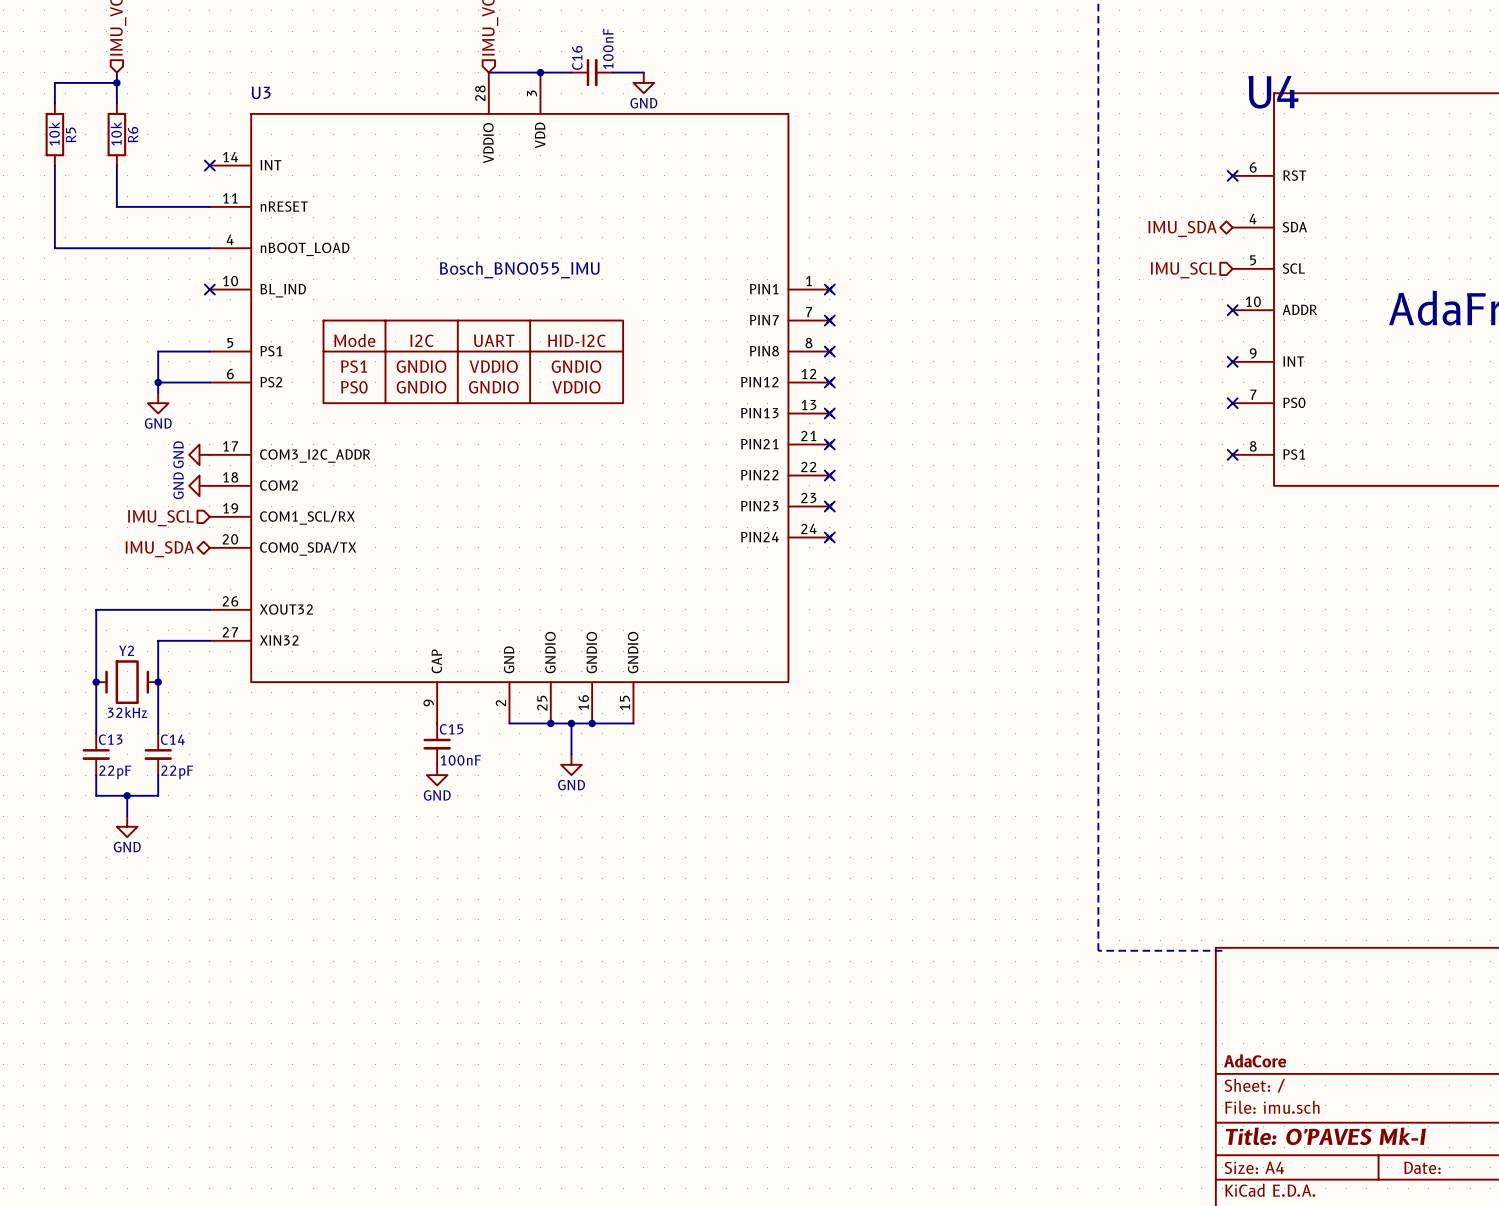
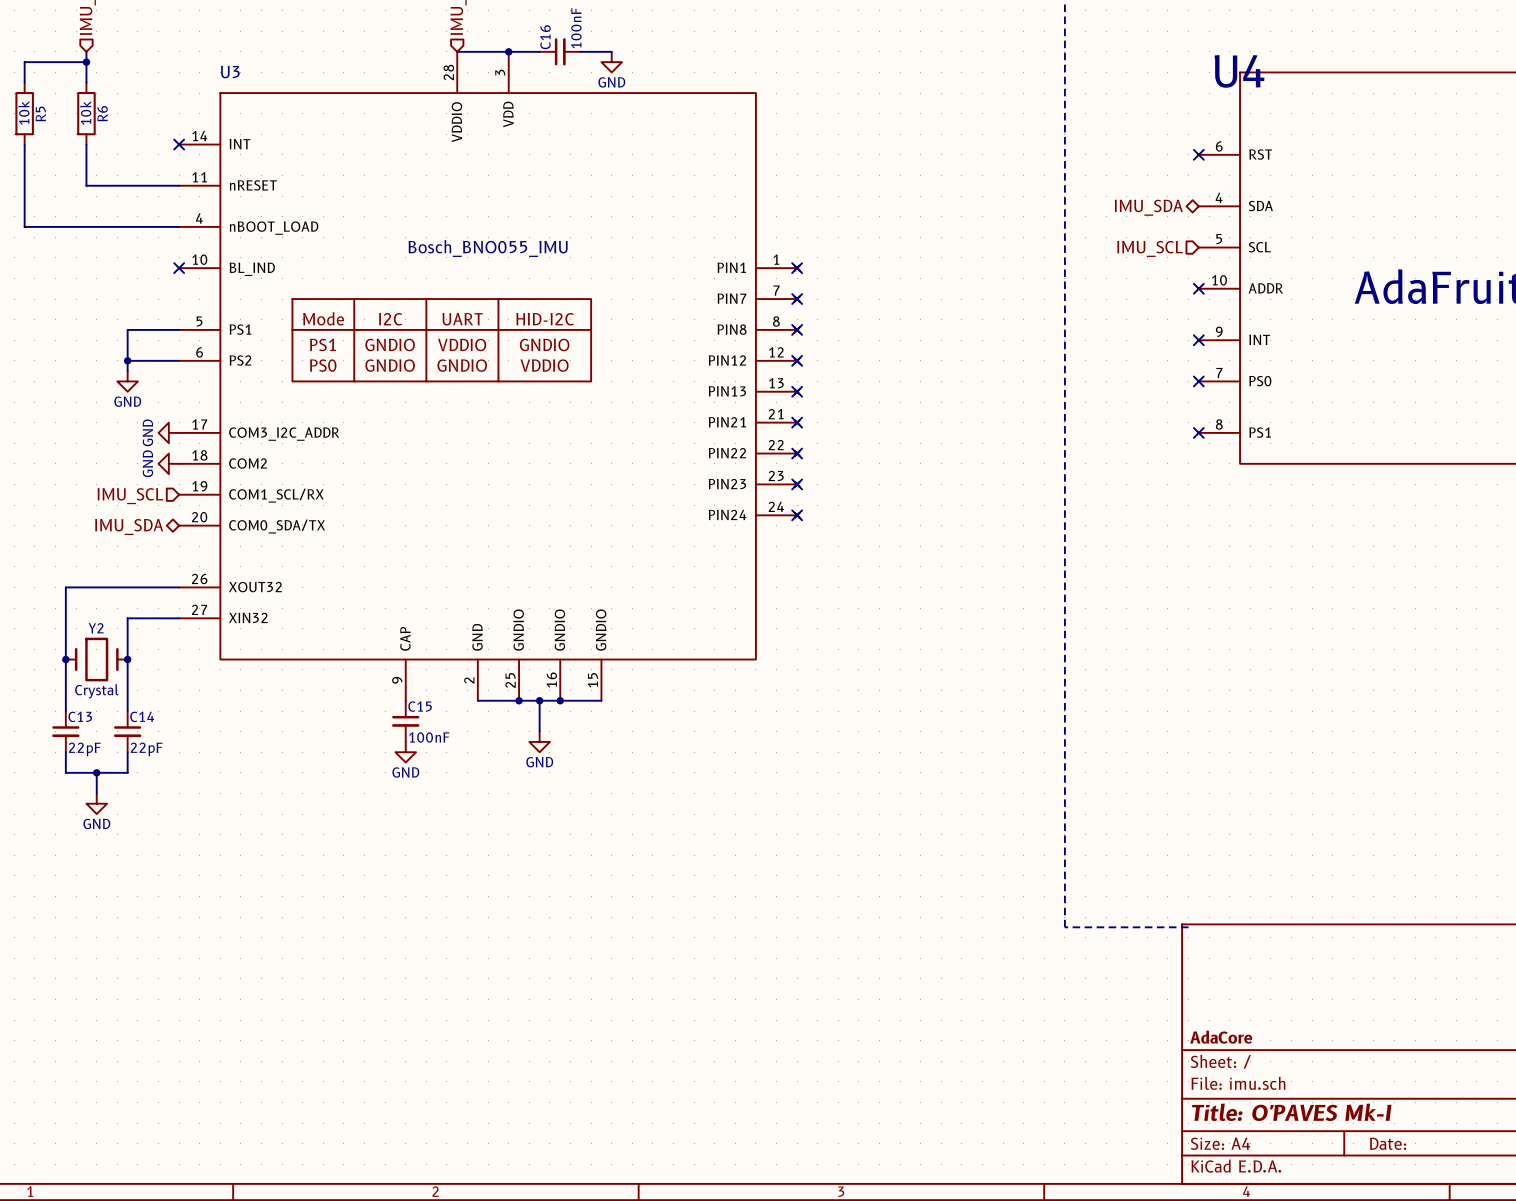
Y2 value: 32kHz (127, 712) -> Crystal (96, 691)

